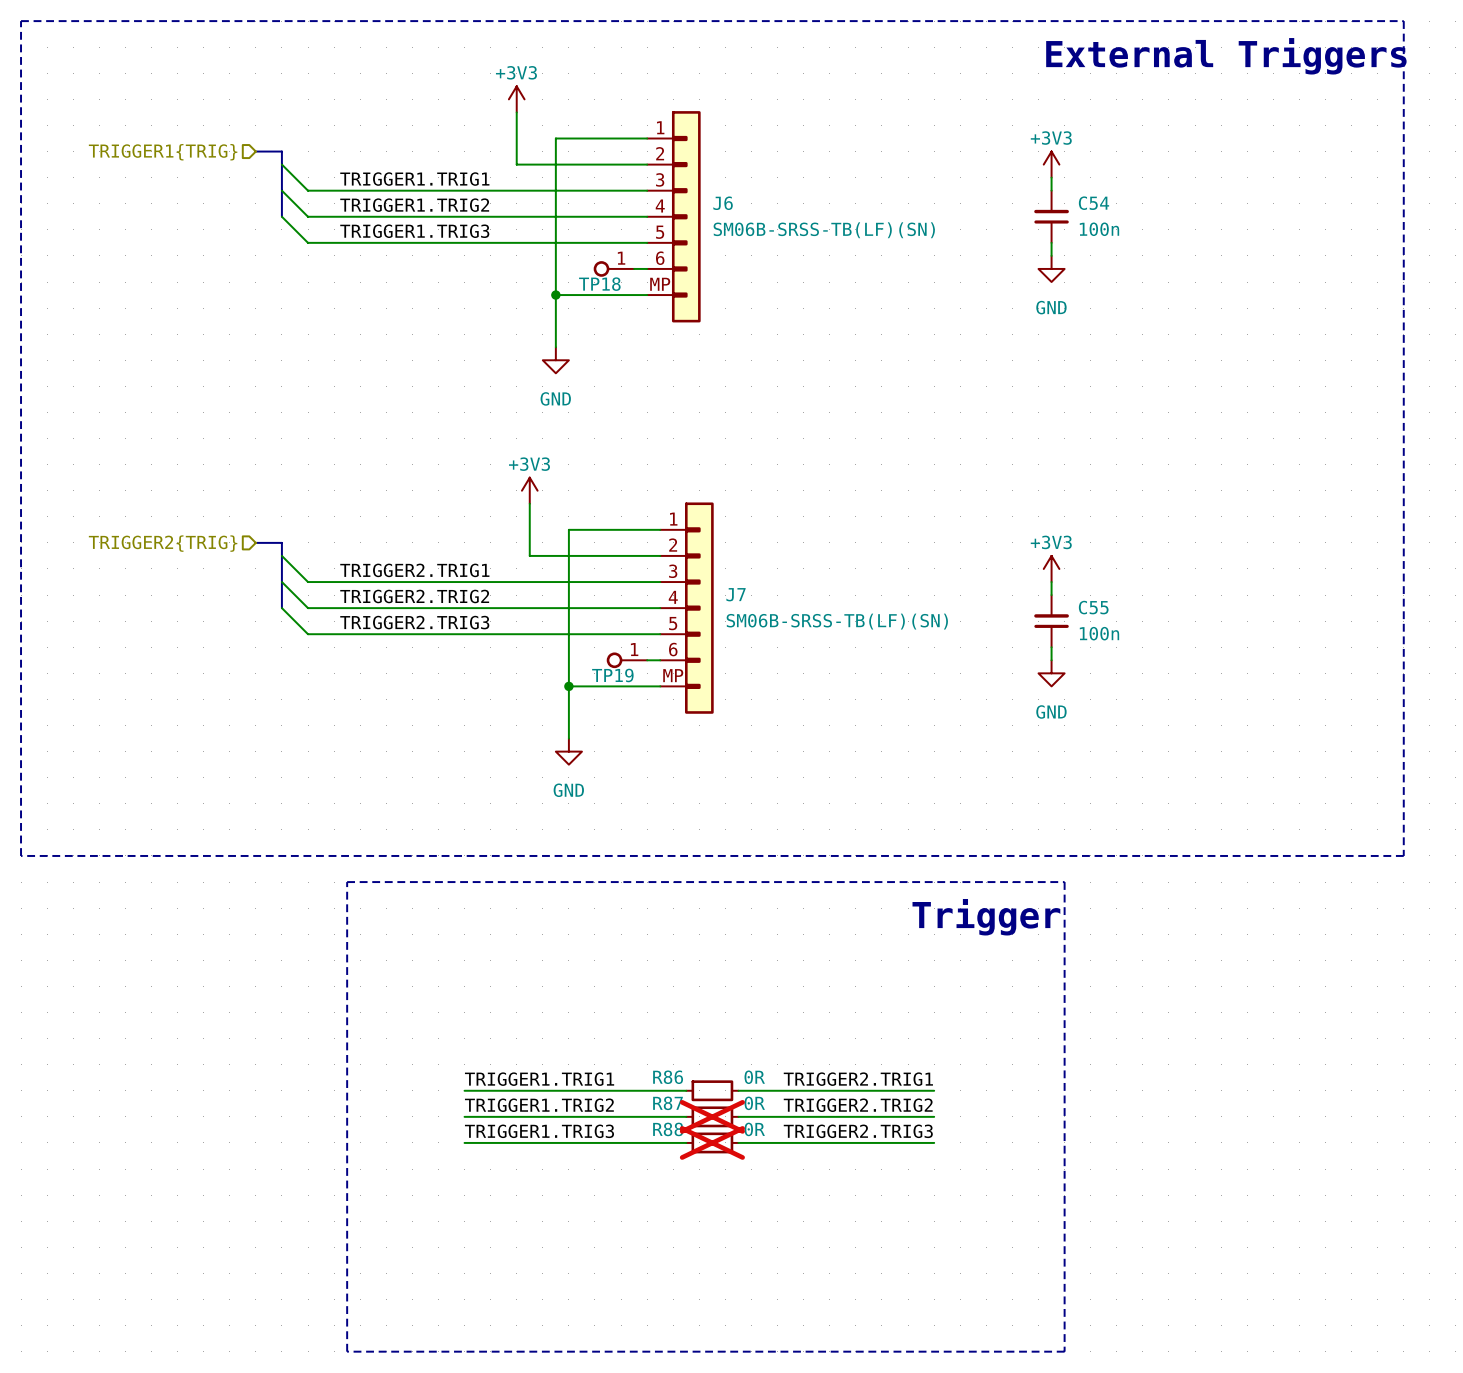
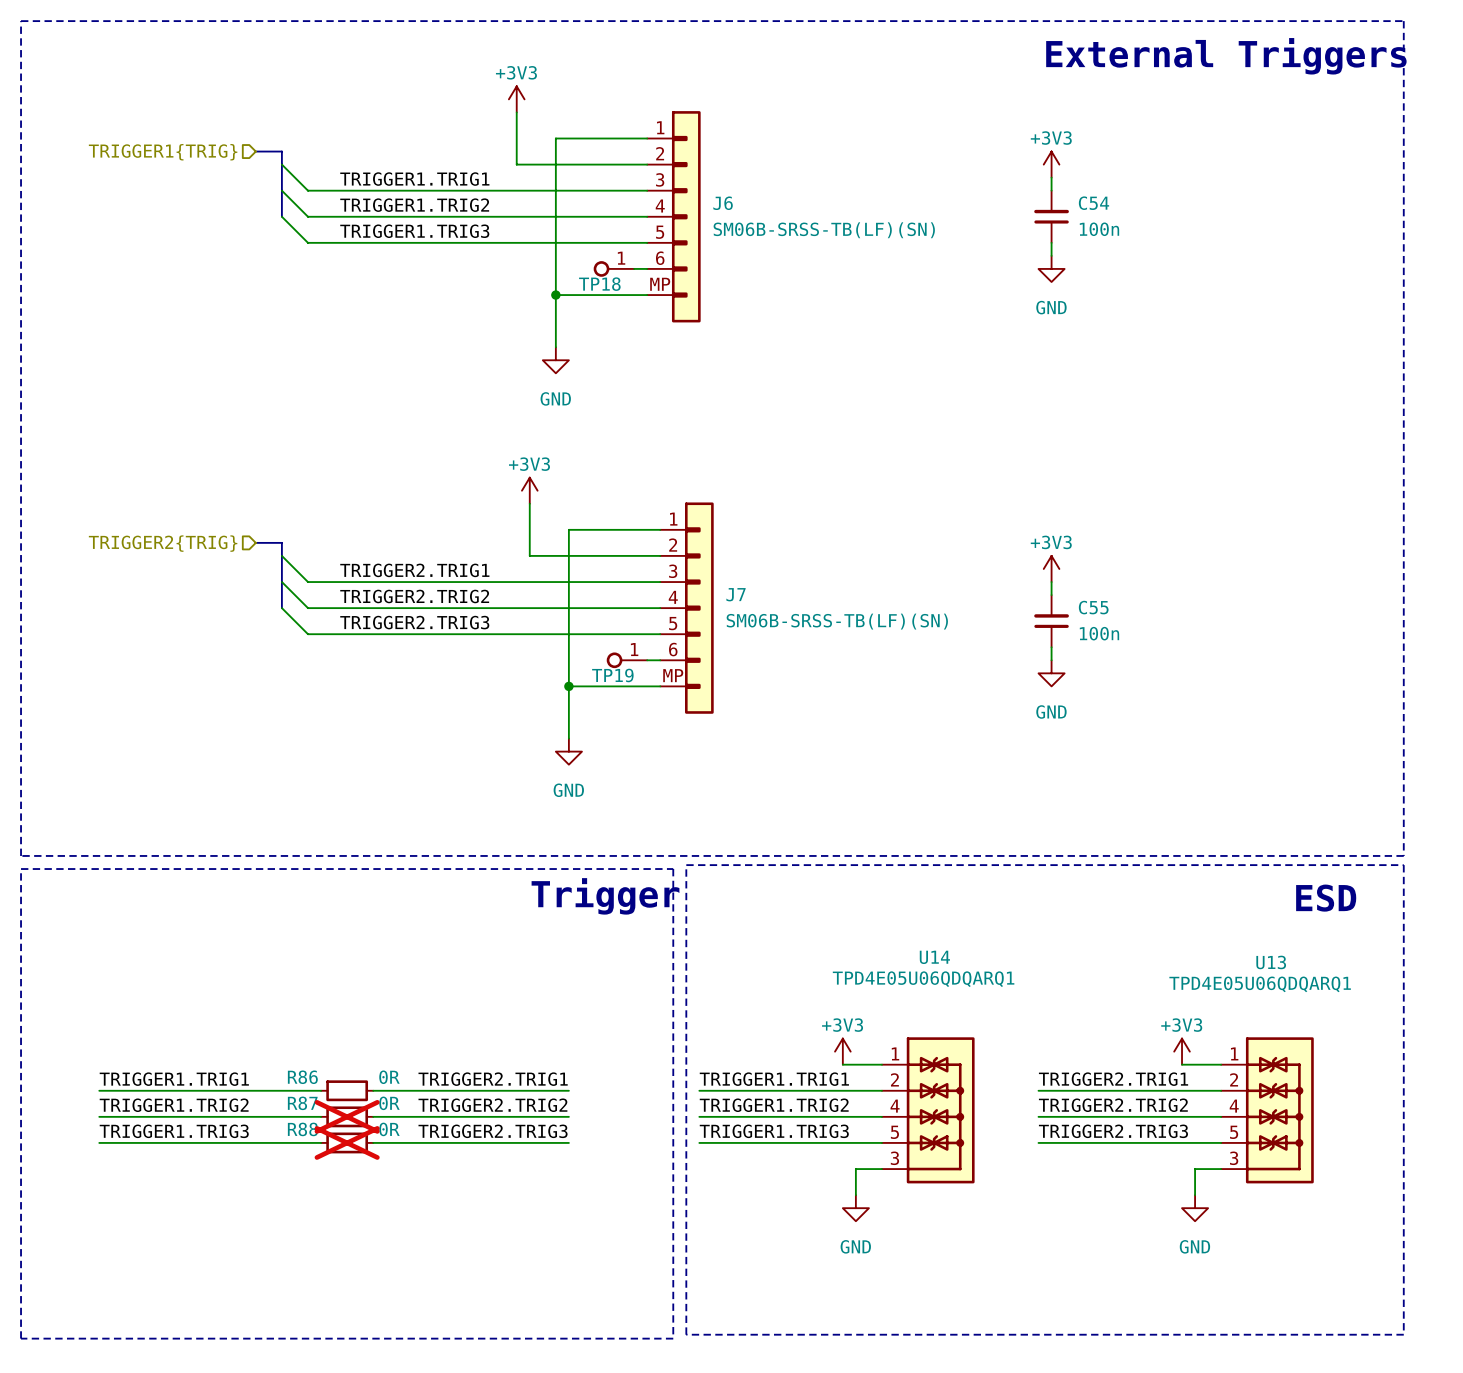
line: none -> (686, 865) (1403, 865) (1403, 1334) (686, 1334) (686, 865)
line: none -> (21, 869) (673, 869) (673, 1338) (21, 1338) (21, 869)
line: (347, 882) (1064, 882) (1064, 1351) (347, 1351) (347, 882) -> none
text: none -> Trigger (605, 896)
text: none -> ESD (1326, 898)
text: Trigger (986, 917) -> none
power symbol: none -> +3V3 (842, 1051)
power symbol: none -> +3V3 (1182, 1051)
wire: none -> (842, 1064) (881, 1064)
wire: none -> (1182, 1064) (1221, 1064)
label: none -> TRIGGER1.TRIG1 (174, 1079)
label: none -> TRIGGER2.TRIG1 (493, 1079)
label: TRIGGER1.TRIG1 (539, 1079) -> none
label: none -> TRIGGER1.TRIG1 (774, 1079)
label position: TRIGGER2.TRIG1 (858, 1079) -> TRIGGER2.TRIG1 (1113, 1079)
wire: none -> (99, 1090) (321, 1090)
wire: none -> (373, 1090) (464, 1090)
wire: (568, 1090) (686, 1090) -> none
wire: none -> (699, 1090) (738, 1090)
R86 position: (712, 1090) -> (347, 1090)
wire: none -> (1038, 1090) (1221, 1090)
label: none -> TRIGGER1.TRIG2 (174, 1105)
label: none -> TRIGGER2.TRIG2 (492, 1105)
label: TRIGGER1.TRIG2 (539, 1105) -> none
label: none -> TRIGGER1.TRIG2 (774, 1105)
label position: TRIGGER2.TRIG2 (858, 1105) -> TRIGGER2.TRIG2 (1113, 1105)
U14: none -> (928, 1110)
U13: none -> (1267, 1110)
wire: none -> (99, 1116) (321, 1116)
wire: none -> (373, 1116) (464, 1116)
wire: (568, 1116) (686, 1116) -> none
R87 position: (712, 1116) -> (347, 1116)
wire: none -> (1038, 1116) (1221, 1116)
label: none -> TRIGGER1.TRIG3 (174, 1131)
label: none -> TRIGGER2.TRIG3 (493, 1131)
label: TRIGGER1.TRIG3 (539, 1131) -> none
label: none -> TRIGGER1.TRIG3 (774, 1131)
label position: TRIGGER2.TRIG3 (858, 1131) -> TRIGGER2.TRIG3 (1113, 1131)
wire: none -> (99, 1142) (321, 1142)
wire: none -> (373, 1142) (464, 1142)
wire: (568, 1142) (686, 1142) -> none
R88 position: (712, 1142) -> (347, 1142)
wire: none -> (1038, 1142) (1221, 1142)
wire: none -> (881, 1169) (855, 1169) (855, 1195)
wire: none -> (1221, 1169) (1195, 1169) (1195, 1195)
power symbol: none -> GND (855, 1208)
power symbol: none -> GND (1195, 1208)

